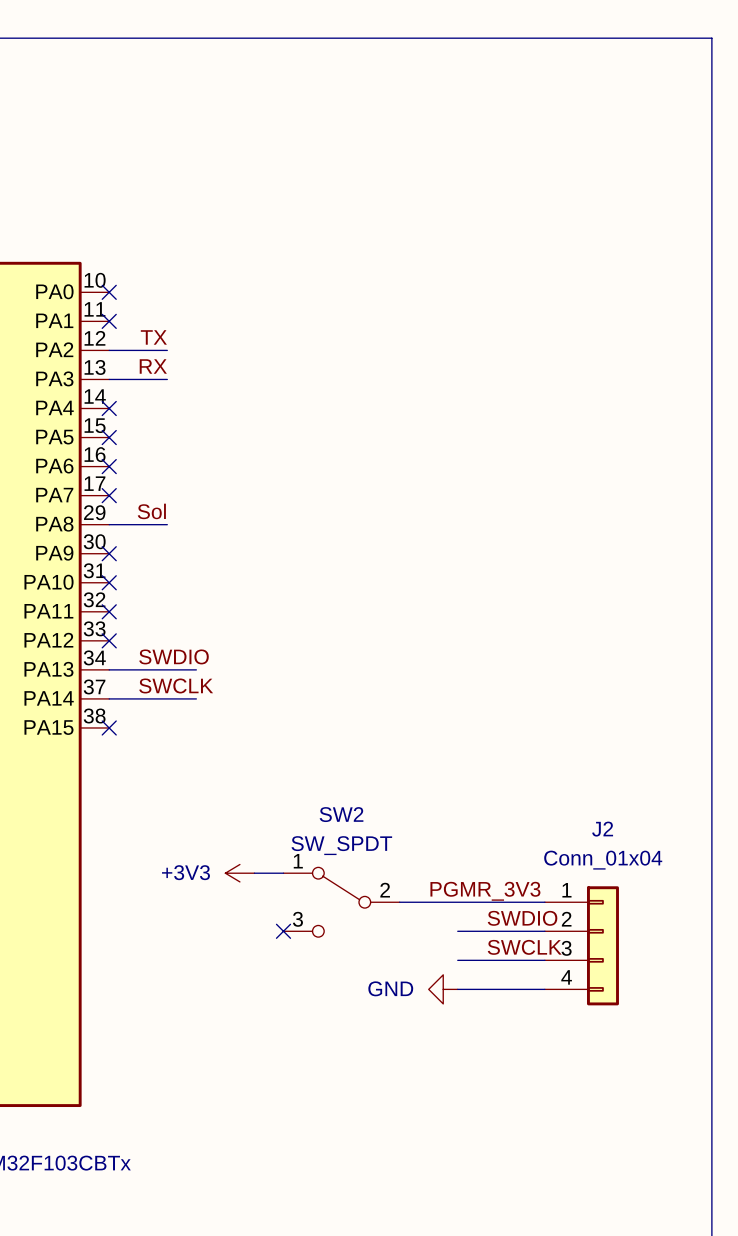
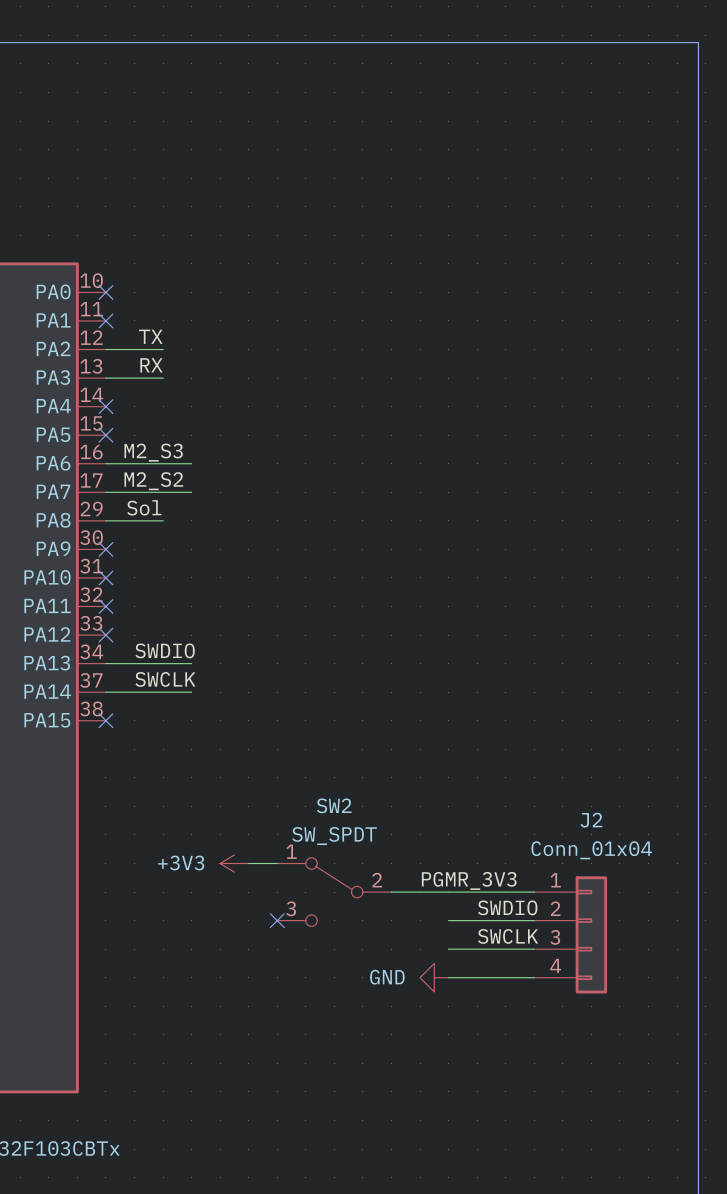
label: none -> M2_S3 (153, 452)
wire: none -> (105, 463) (191, 463)
no-connect mark: (109, 466) -> none
label: none -> M2_S2 (153, 481)
wire: none -> (105, 492) (191, 492)
no-connect mark: (109, 495) -> none

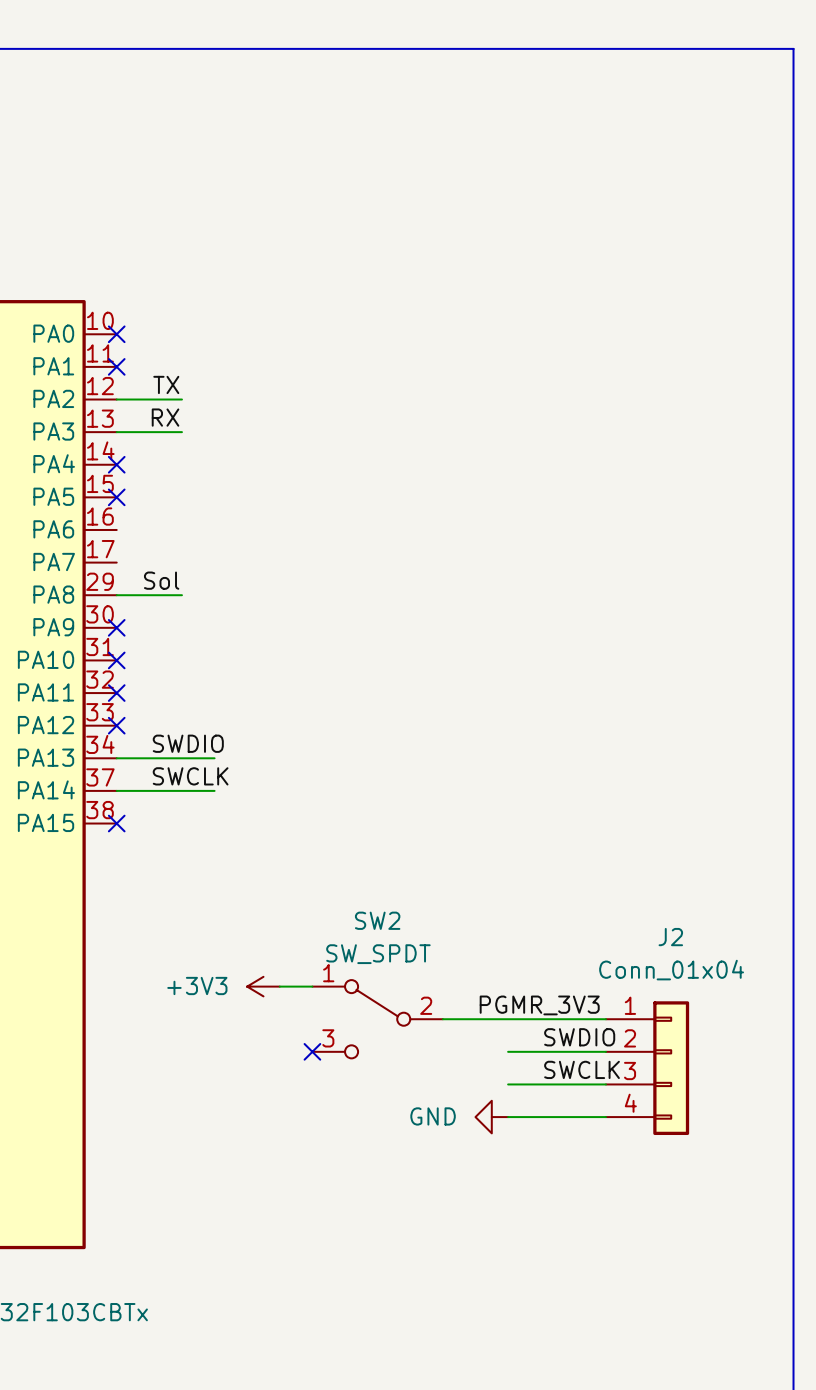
label: M2_S3 (153, 452) -> none
wire: (105, 463) (191, 463) -> none
label: M2_S2 (153, 481) -> none
wire: (105, 492) (191, 492) -> none

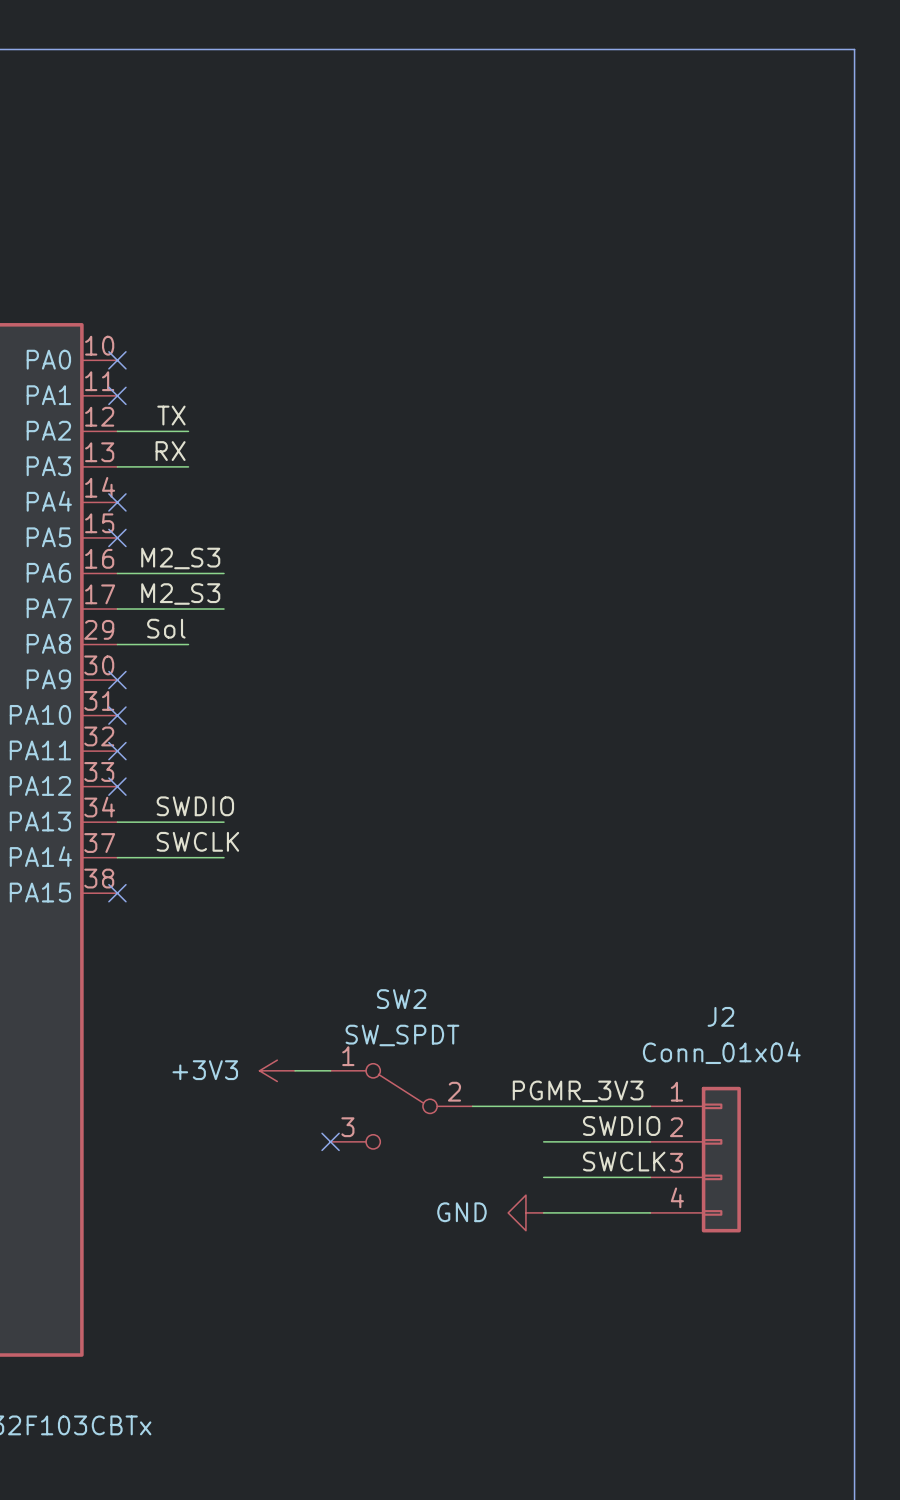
label: none -> M2_S3 (180, 558)
wire: none -> (117, 573) (224, 573)
label: none -> M2_S3 (180, 594)
wire: none -> (117, 609) (224, 609)

